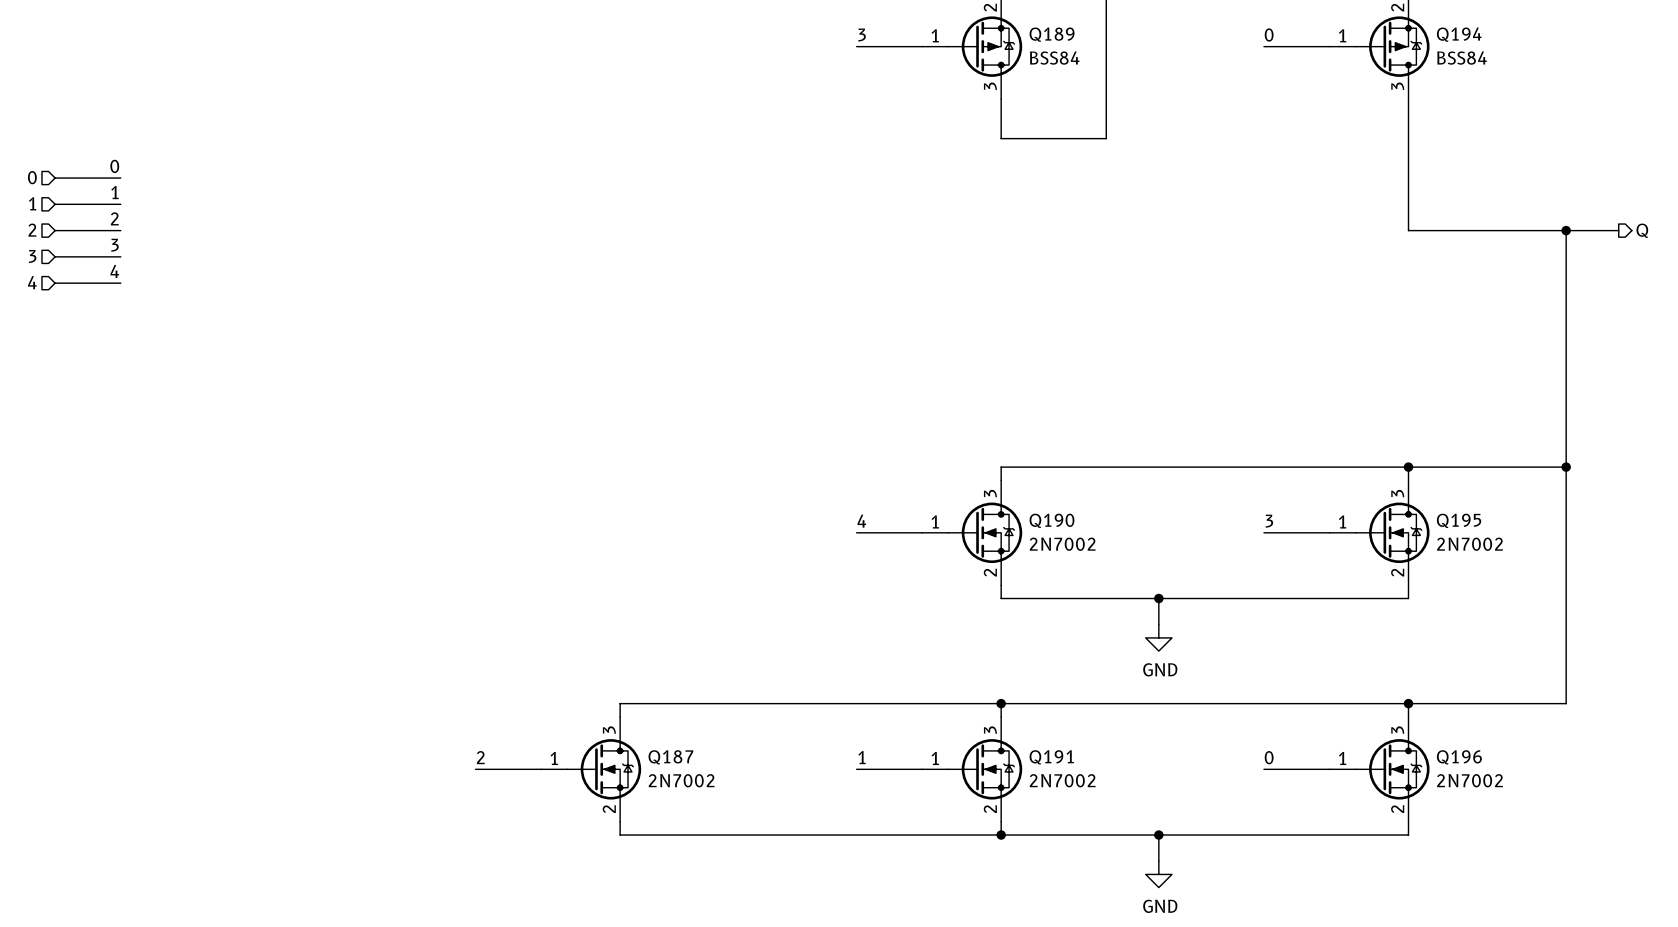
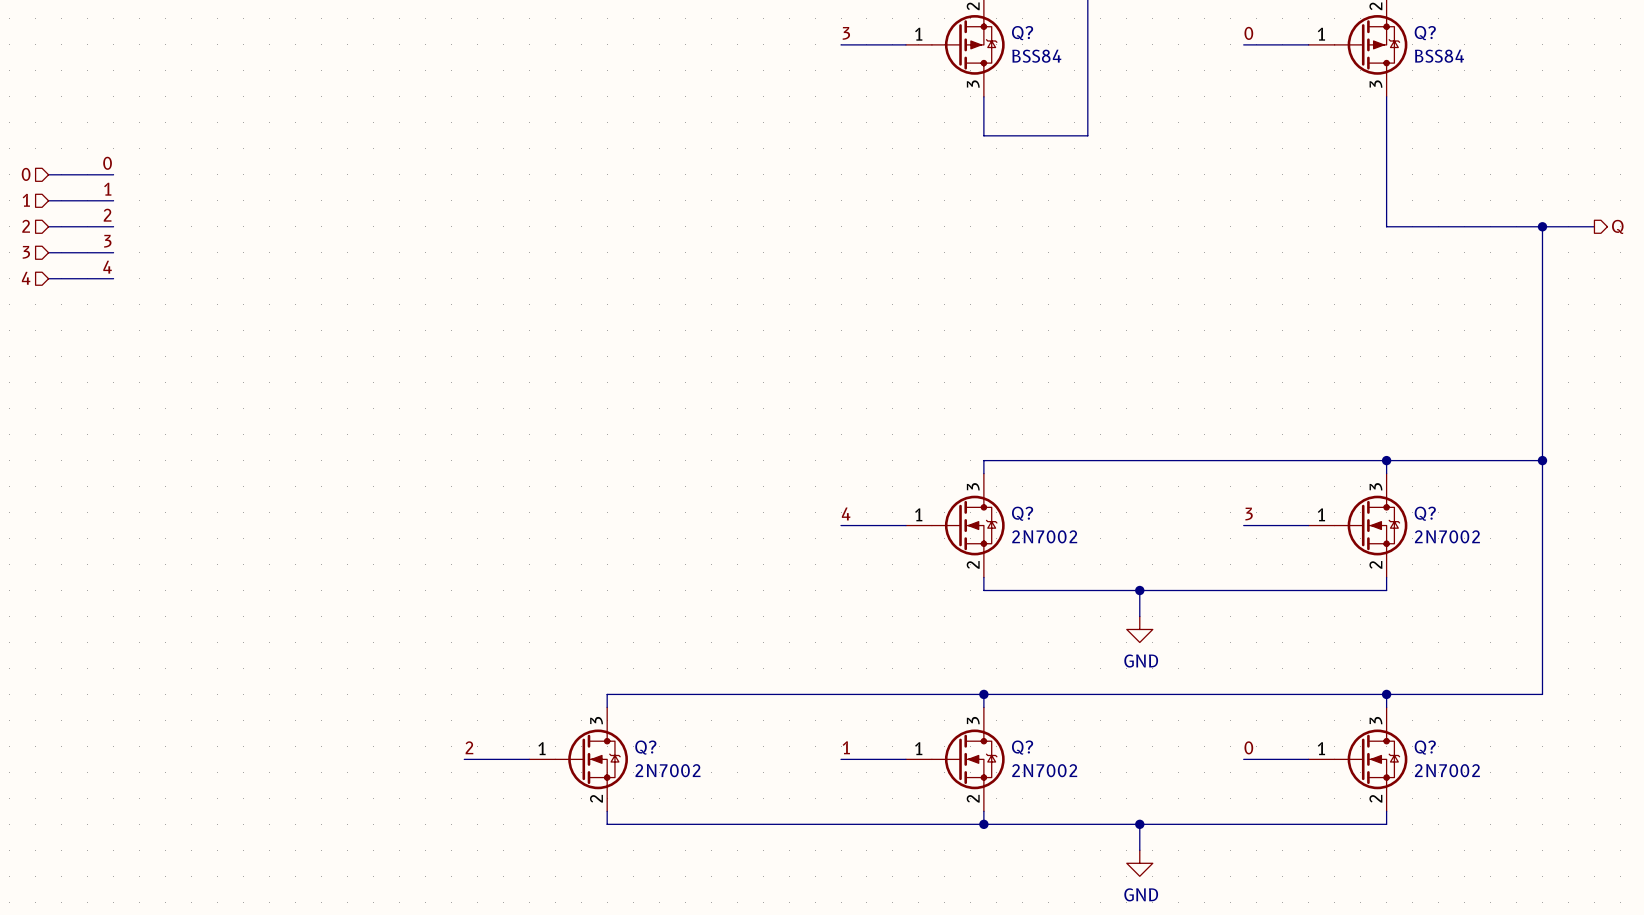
Q189 name: Q189 (1052, 34) -> Q? (1022, 33)
Q194 name: Q194 (1459, 34) -> Q? (1425, 33)
Q190 name: Q190 (1051, 520) -> Q? (1022, 513)
Q195 name: Q195 (1459, 520) -> Q? (1425, 513)
Q187 name: Q187 (670, 757) -> Q? (645, 747)
Q191 name: Q191 (1051, 757) -> Q? (1022, 747)
Q196 name: Q196 (1459, 757) -> Q? (1425, 747)

